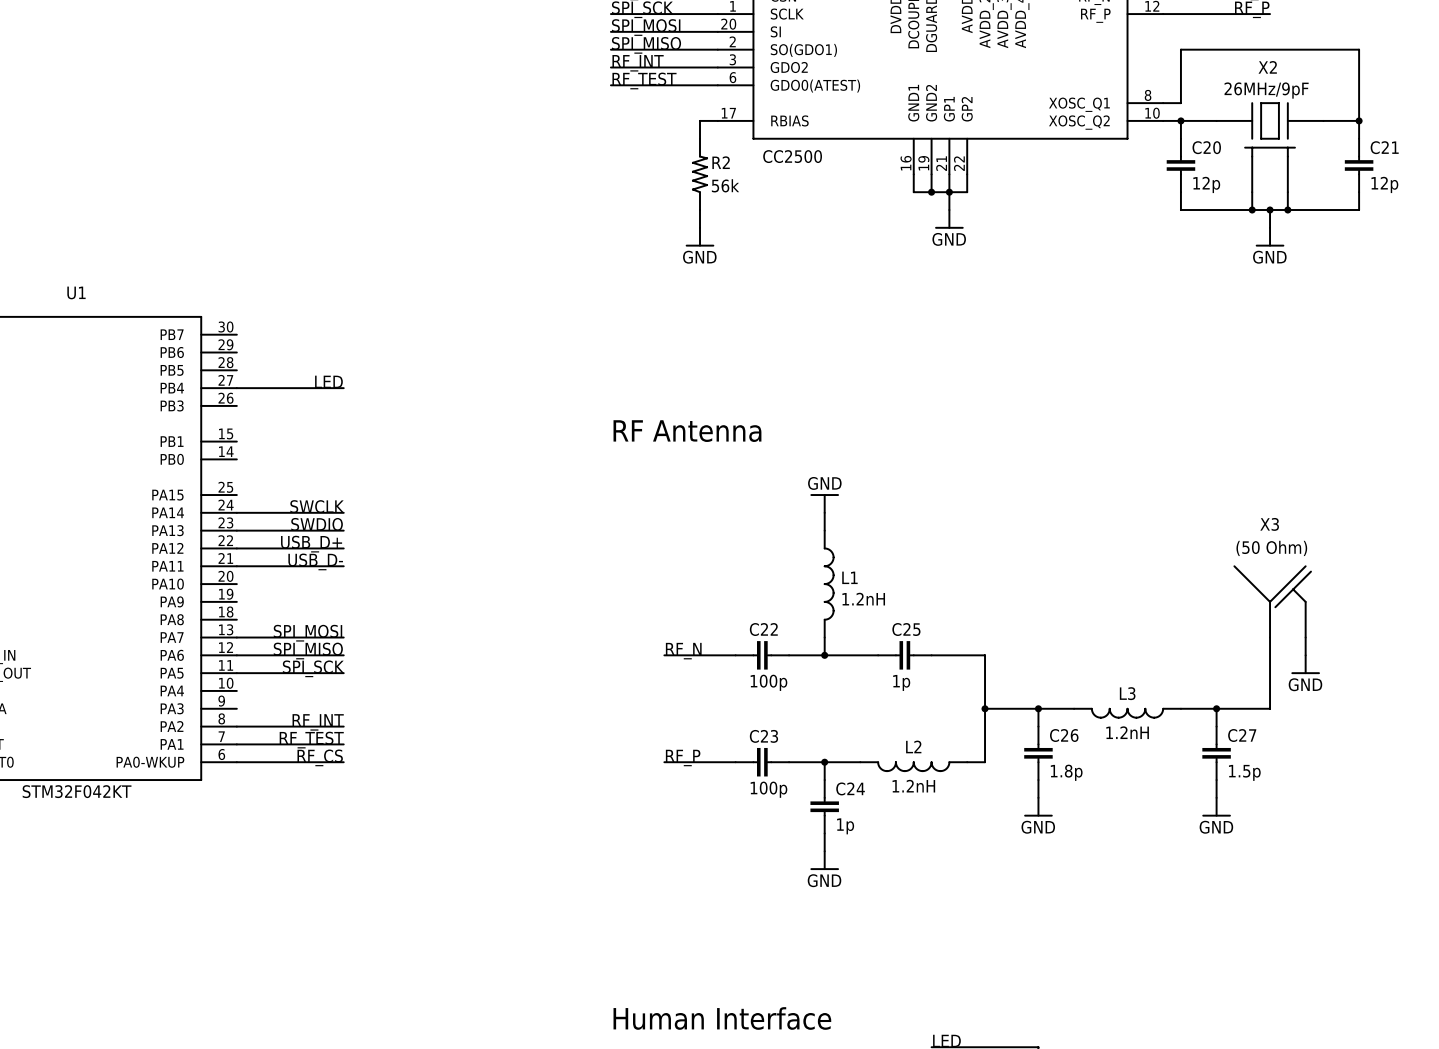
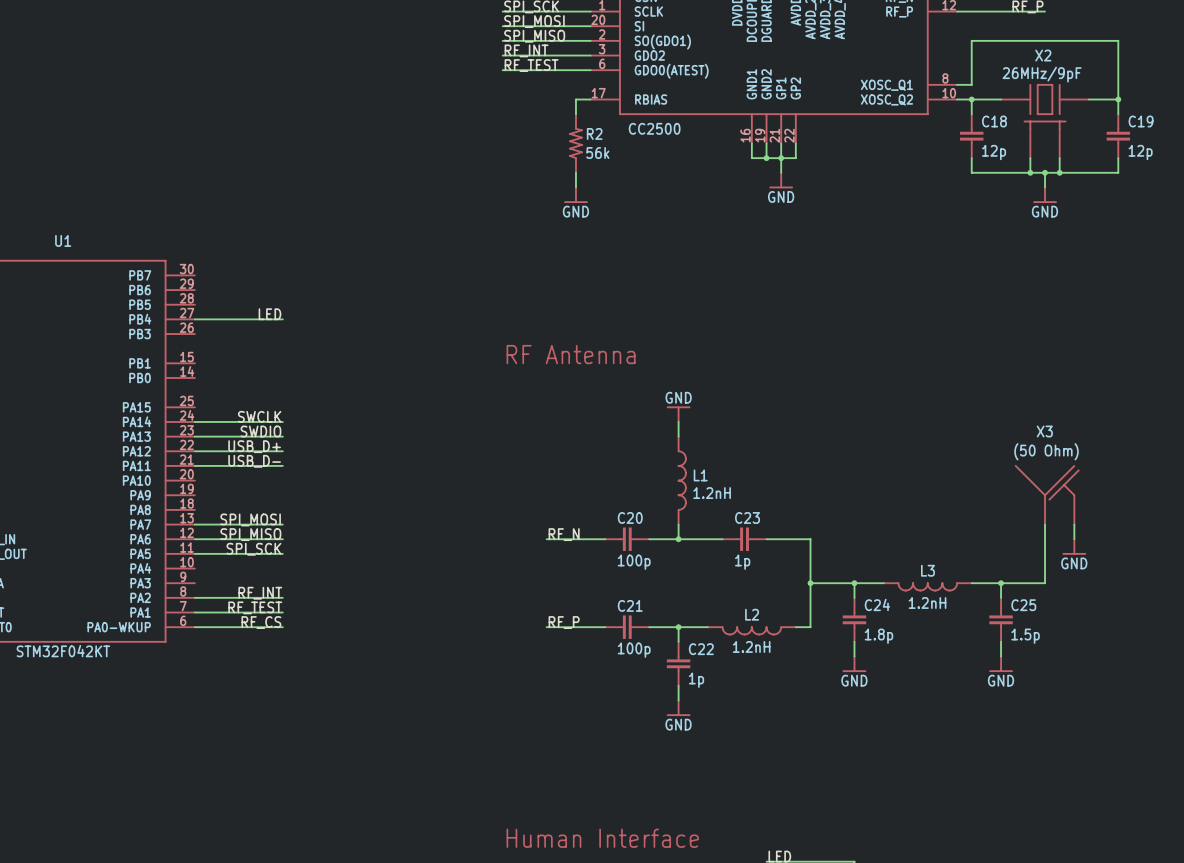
C20 name: C20 (1206, 147) -> C18 (994, 121)
C21 name: C21 (1384, 147) -> C19 (1141, 121)
C22 name: C22 (763, 629) -> C20 (630, 517)
C25 name: C25 (906, 629) -> C23 (747, 517)
C26 name: C26 (1064, 735) -> C24 (877, 604)
C27 name: C27 (1242, 735) -> C25 (1023, 605)
C23 name: C23 (763, 736) -> C21 (630, 605)
C24 name: C24 (850, 788) -> C22 (701, 649)

